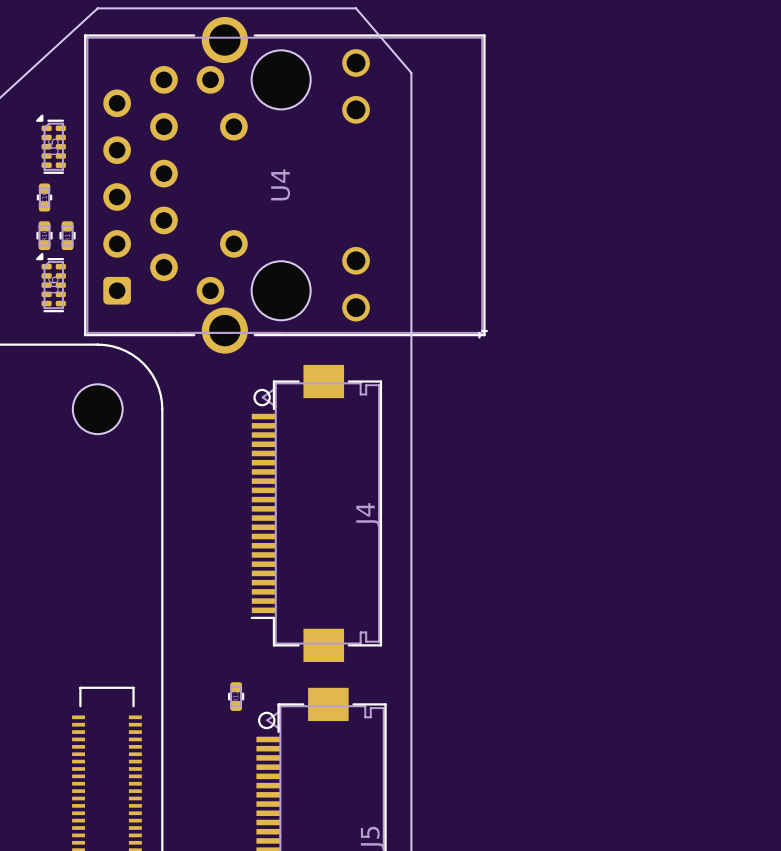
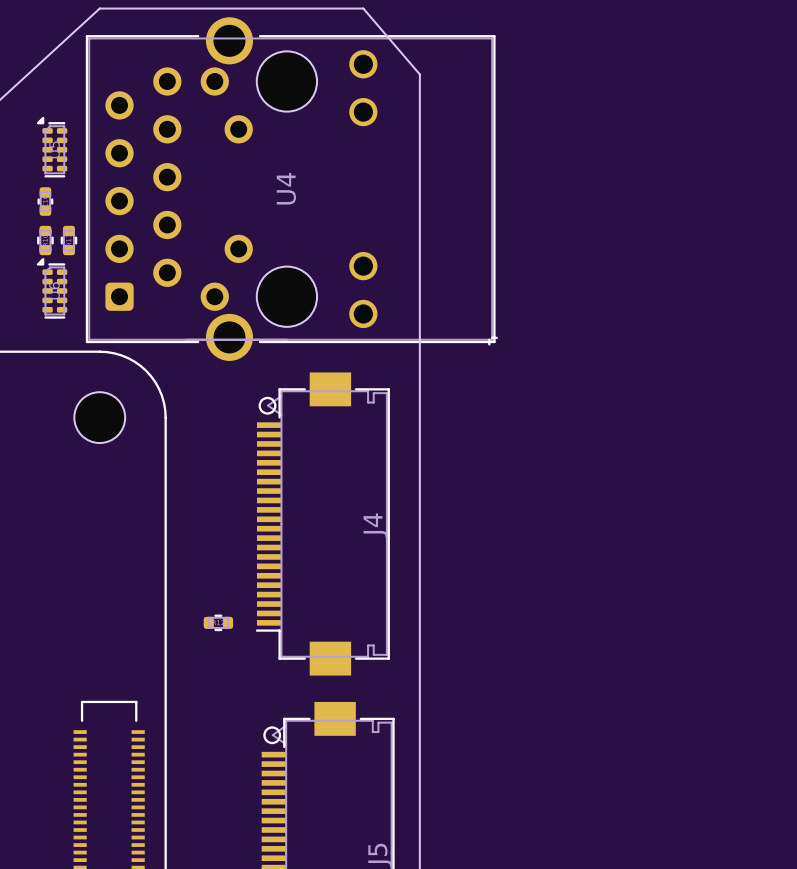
part rotation: 0° (236, 696) -> 90° clockwise (218, 622)
part position: (236, 696) -> (218, 622)

